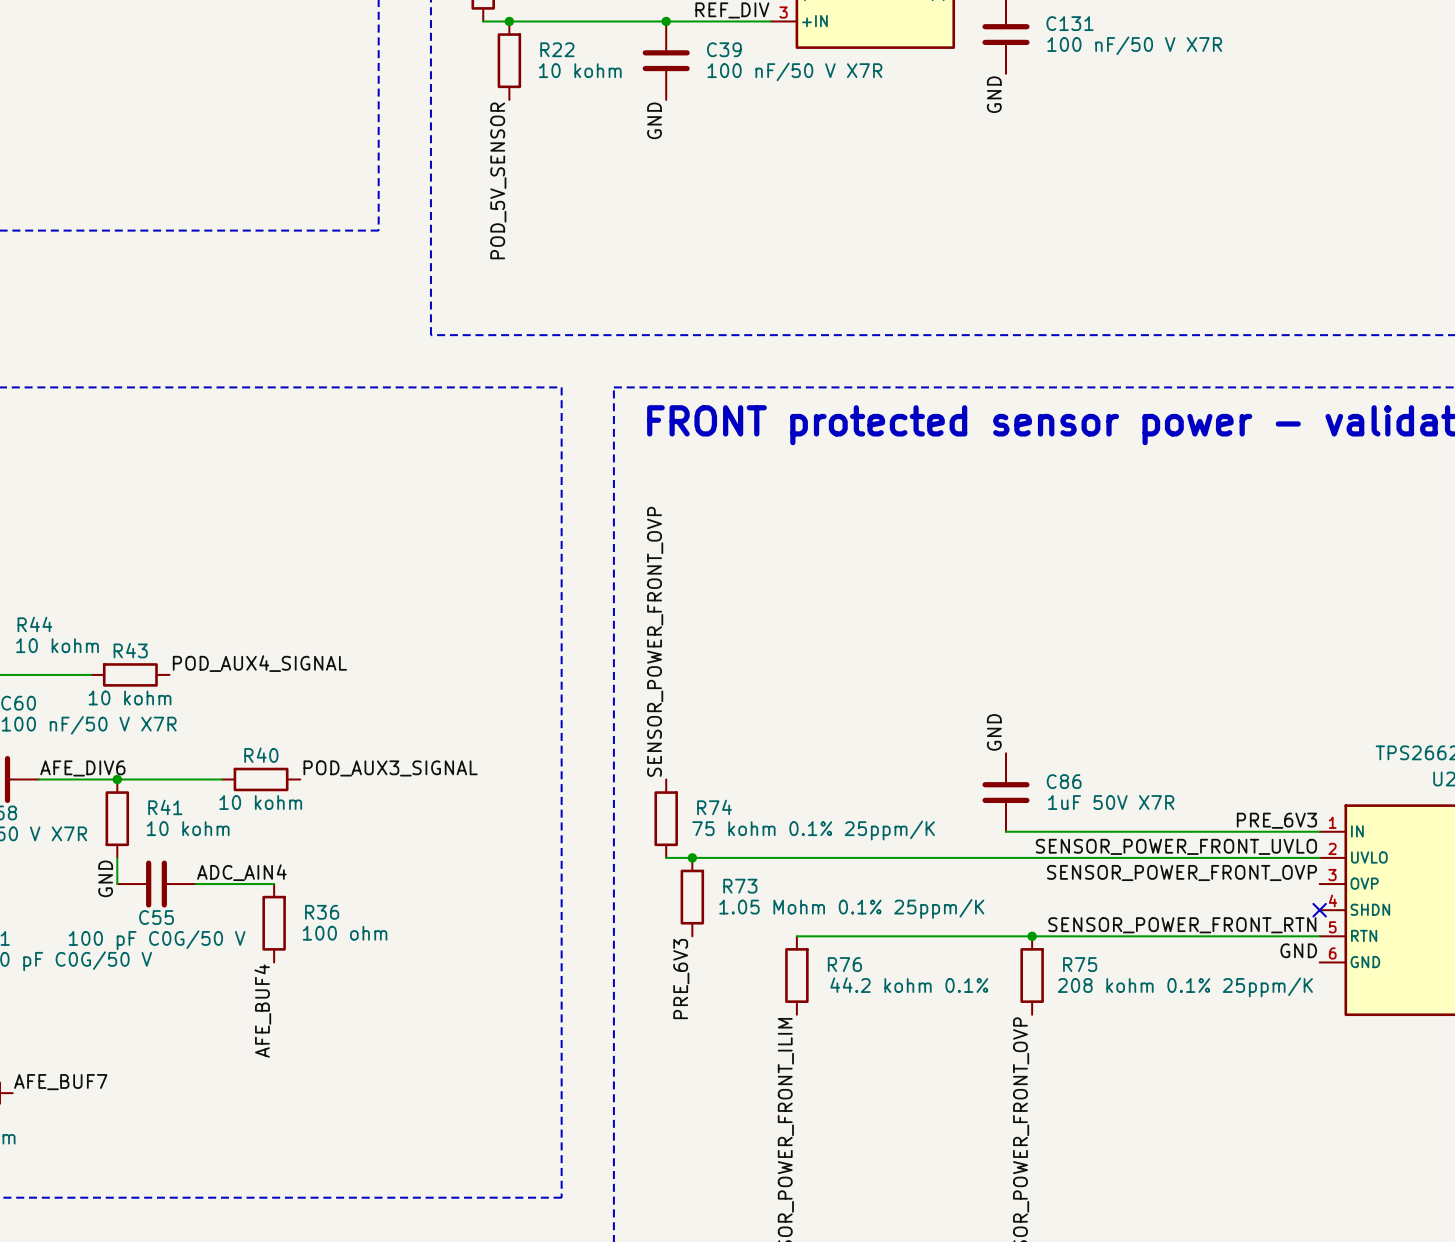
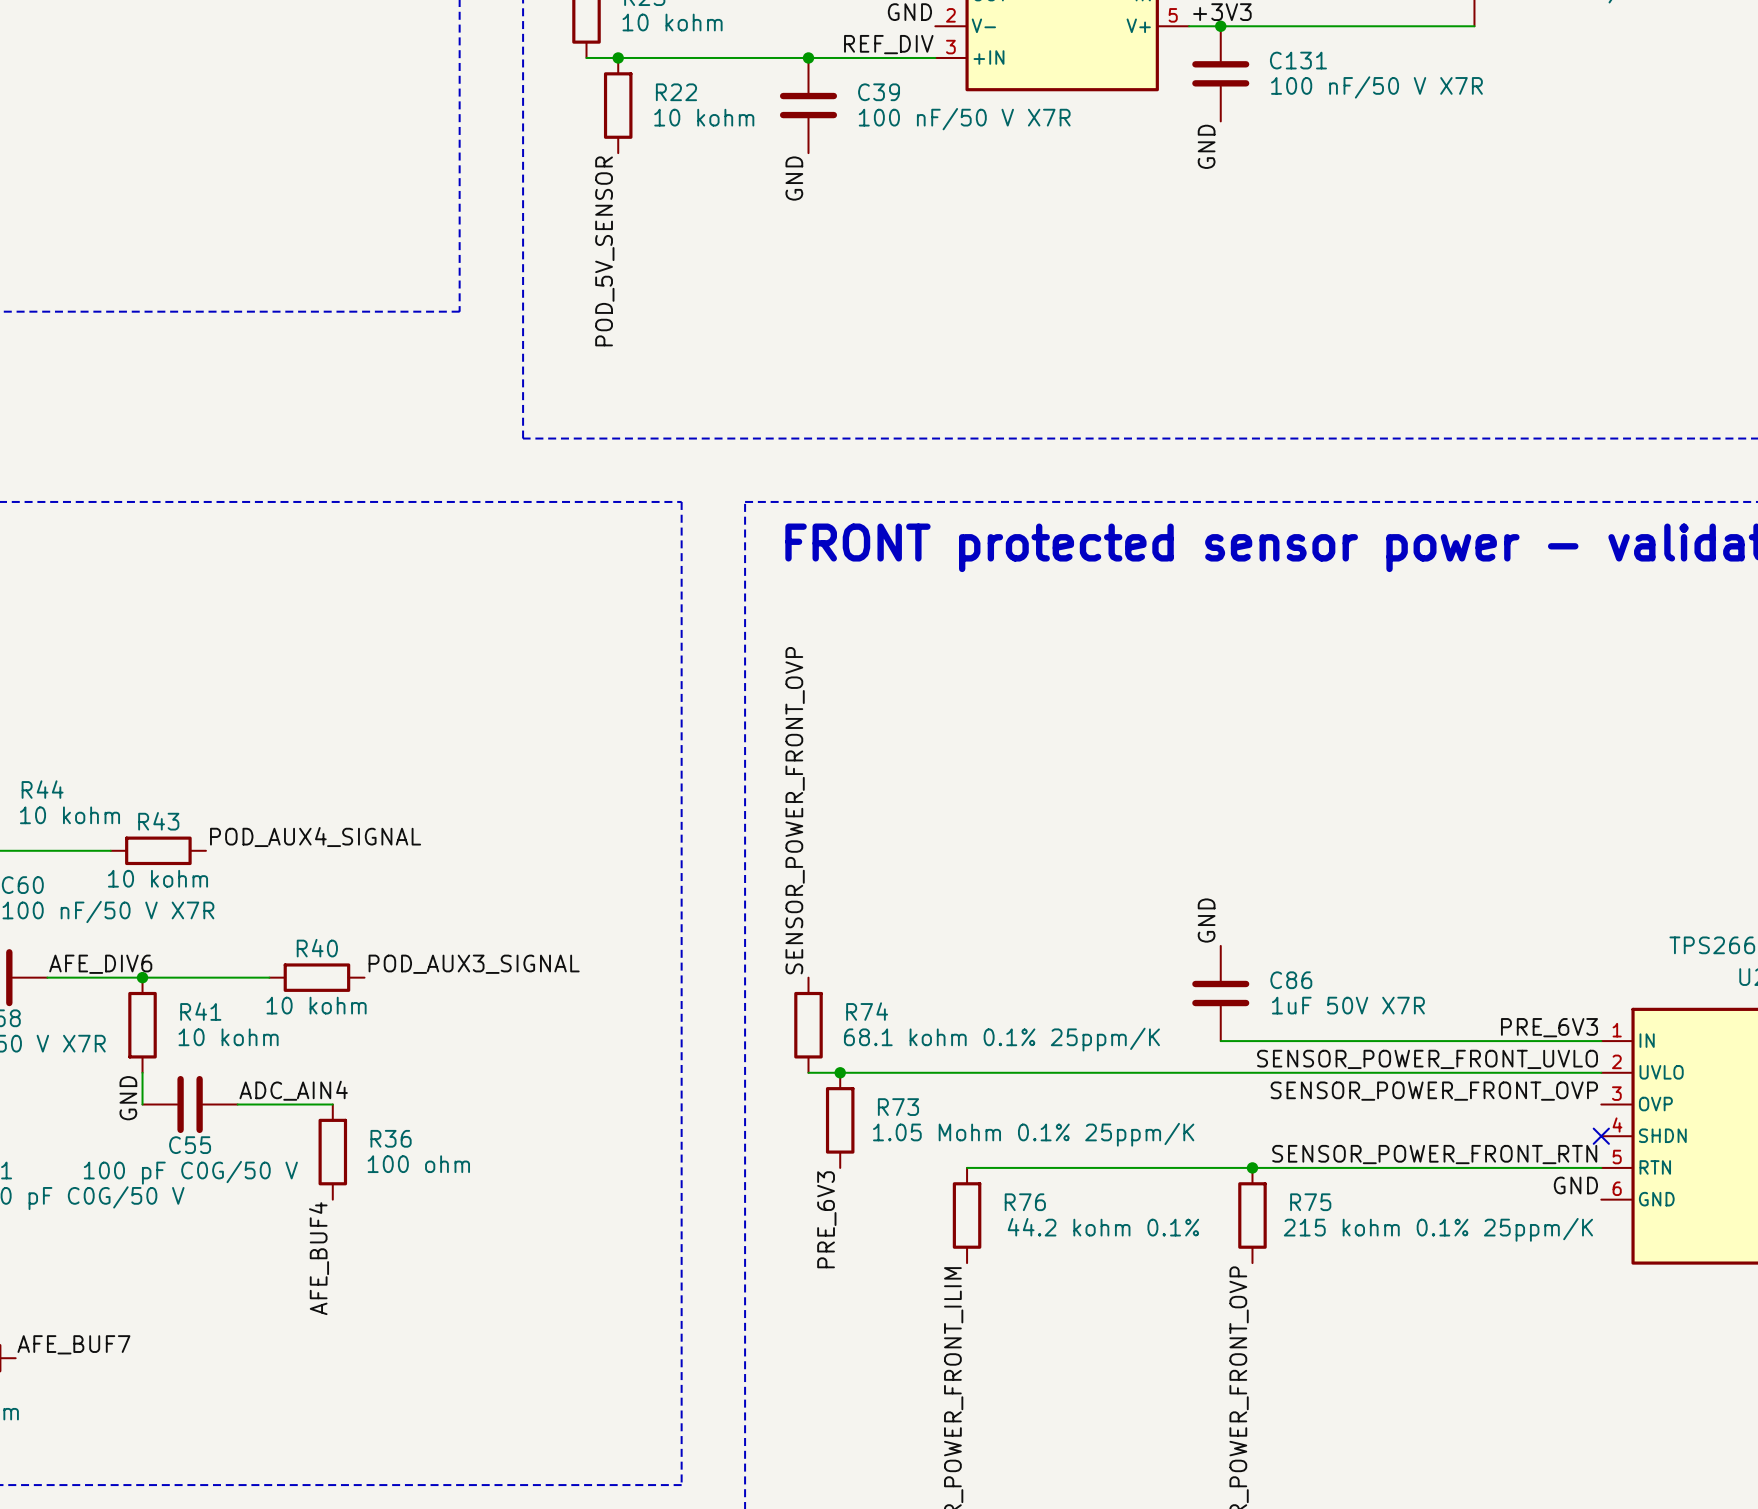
R74 value: 75 kohm 0.1% 25ppm/K (813, 830) -> 68.1 kohm 0.1% 25ppm/K (1001, 1039)
R75 value: 208 kohm 0.1% 25ppm/K (1185, 987) -> 215 kohm 0.1% 25ppm/K (1438, 1229)

